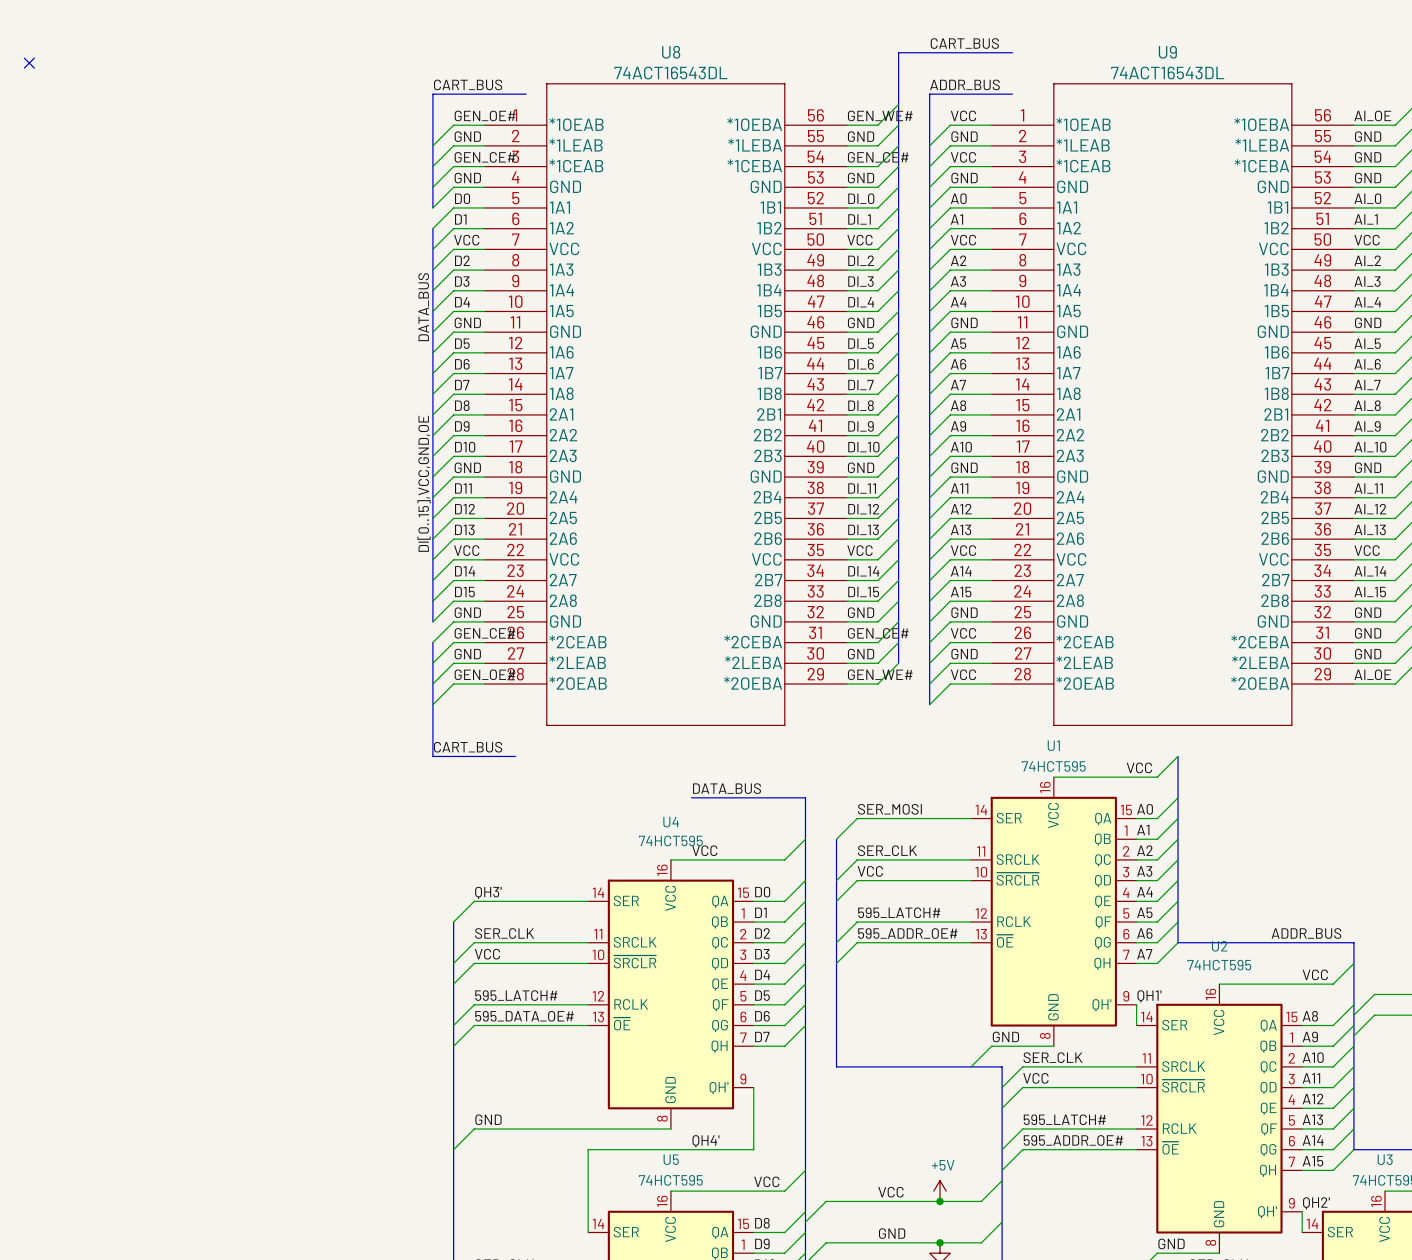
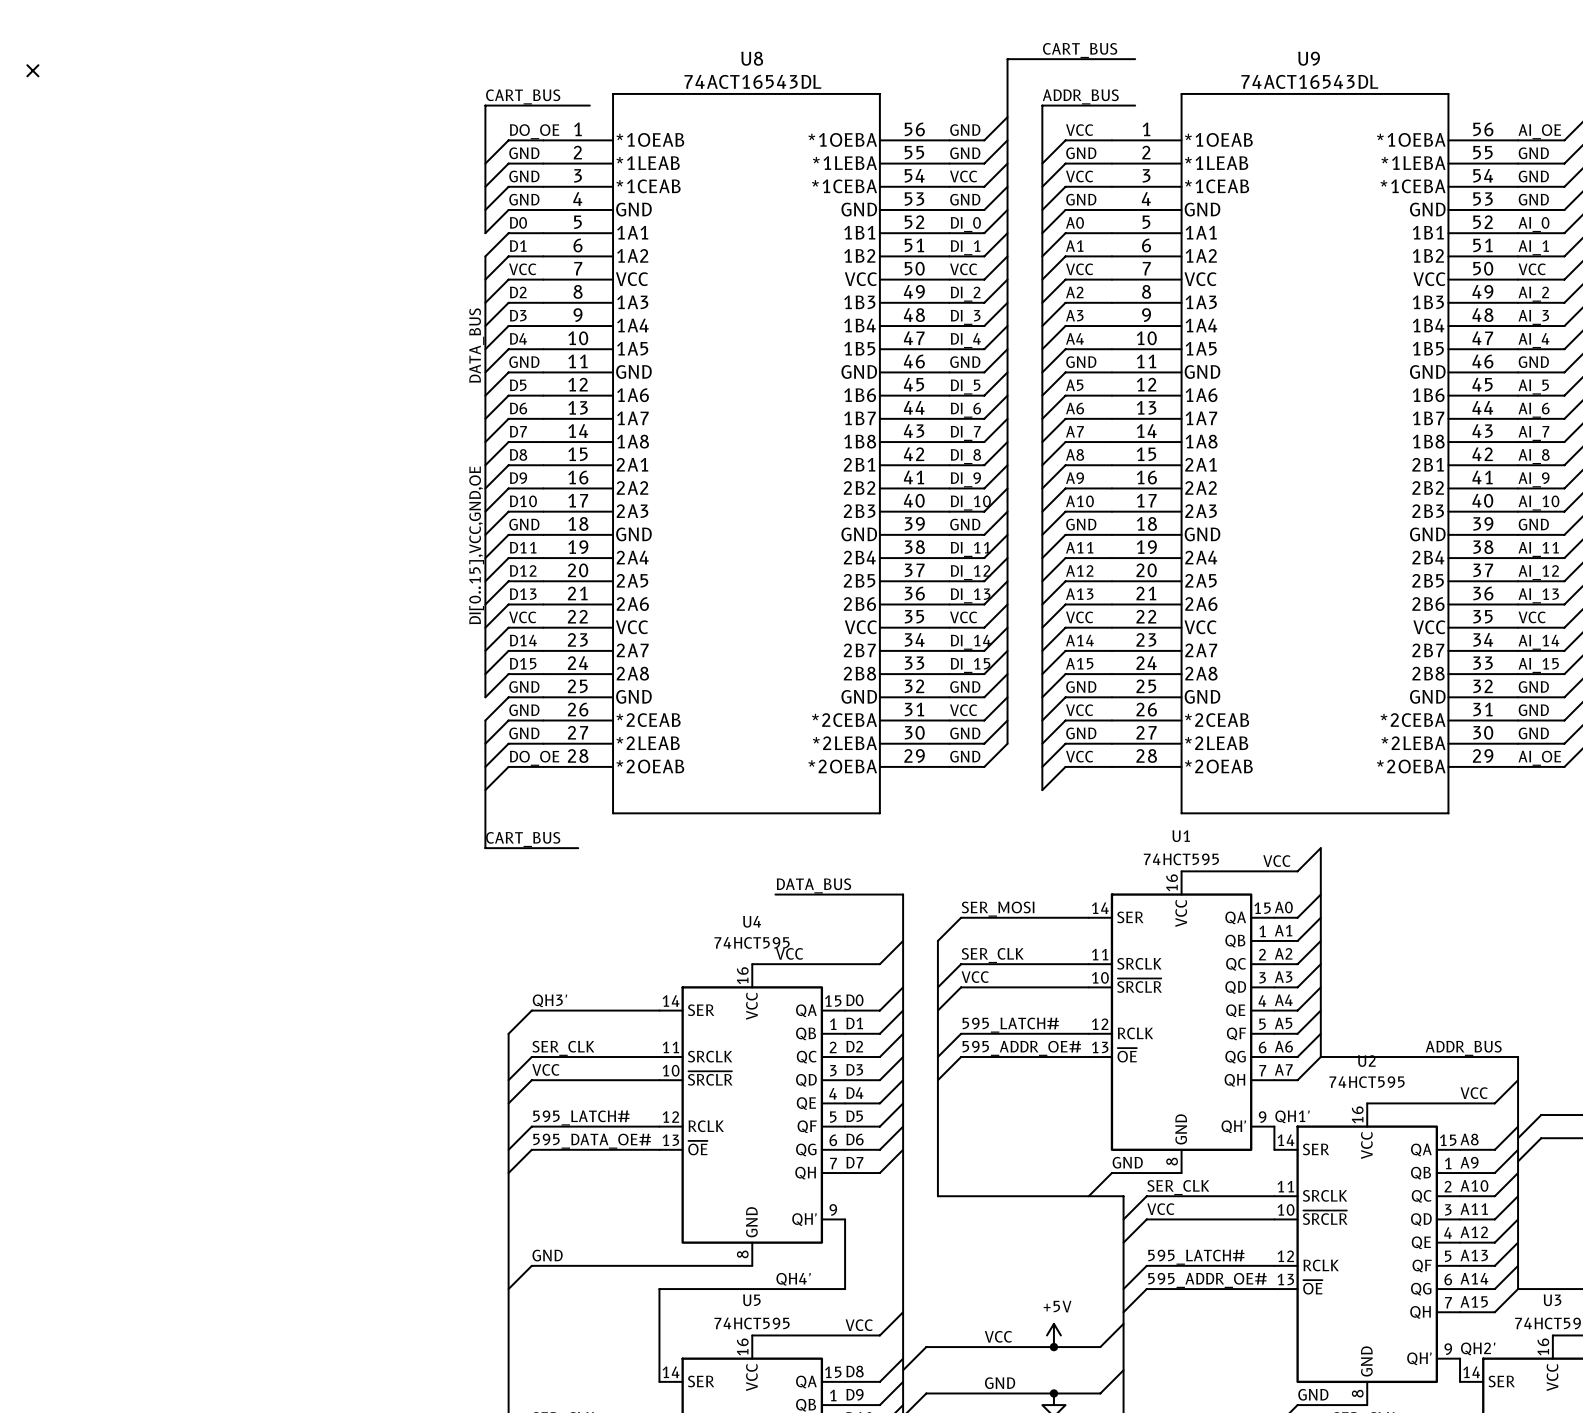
label: GEN_OE# (485, 115) -> DO_OE (534, 131)
label: GEN_WE# (880, 115) -> GND (965, 130)
label: GEN_CE# (485, 157) -> GND (524, 176)
label: GEN_CE# (878, 157) -> VCC (963, 176)
label: GEN_CE# (485, 633) -> GND (524, 710)
label: GEN_CE# (878, 633) -> VCC (963, 710)
label: GEN_OE# (485, 674) -> DO_OE (534, 758)
label: GEN_WE# (880, 674) -> GND (965, 756)

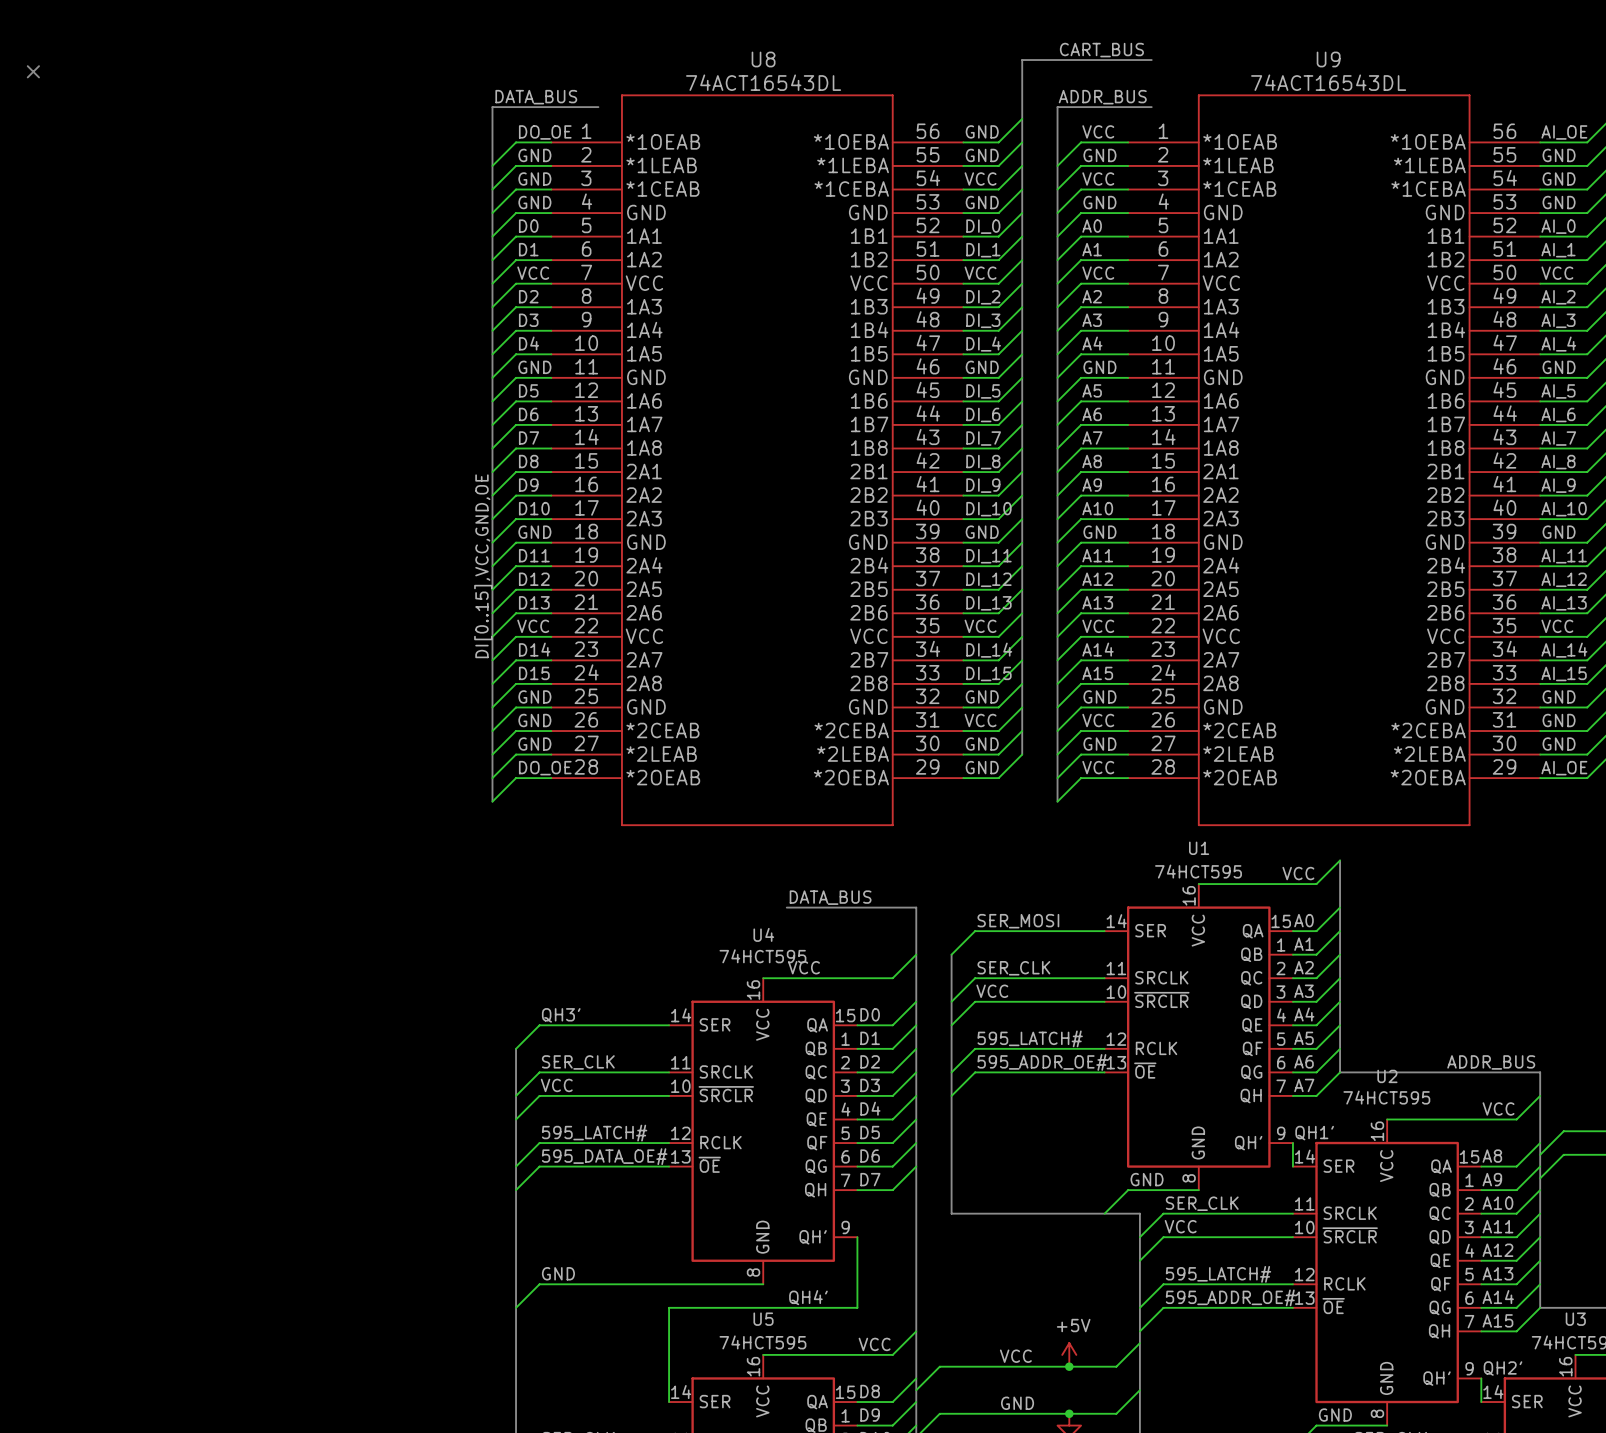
label: CART_BUS (523, 96) -> DATA_BUS (536, 97)
bus: none -> (492, 236) (492, 260)
label: DATA_BUS (476, 345) -> none
bus: none -> (492, 707) (492, 731)
bus: (485, 790) (485, 848) (578, 848) -> none
label: CART_BUS (523, 839) -> none

